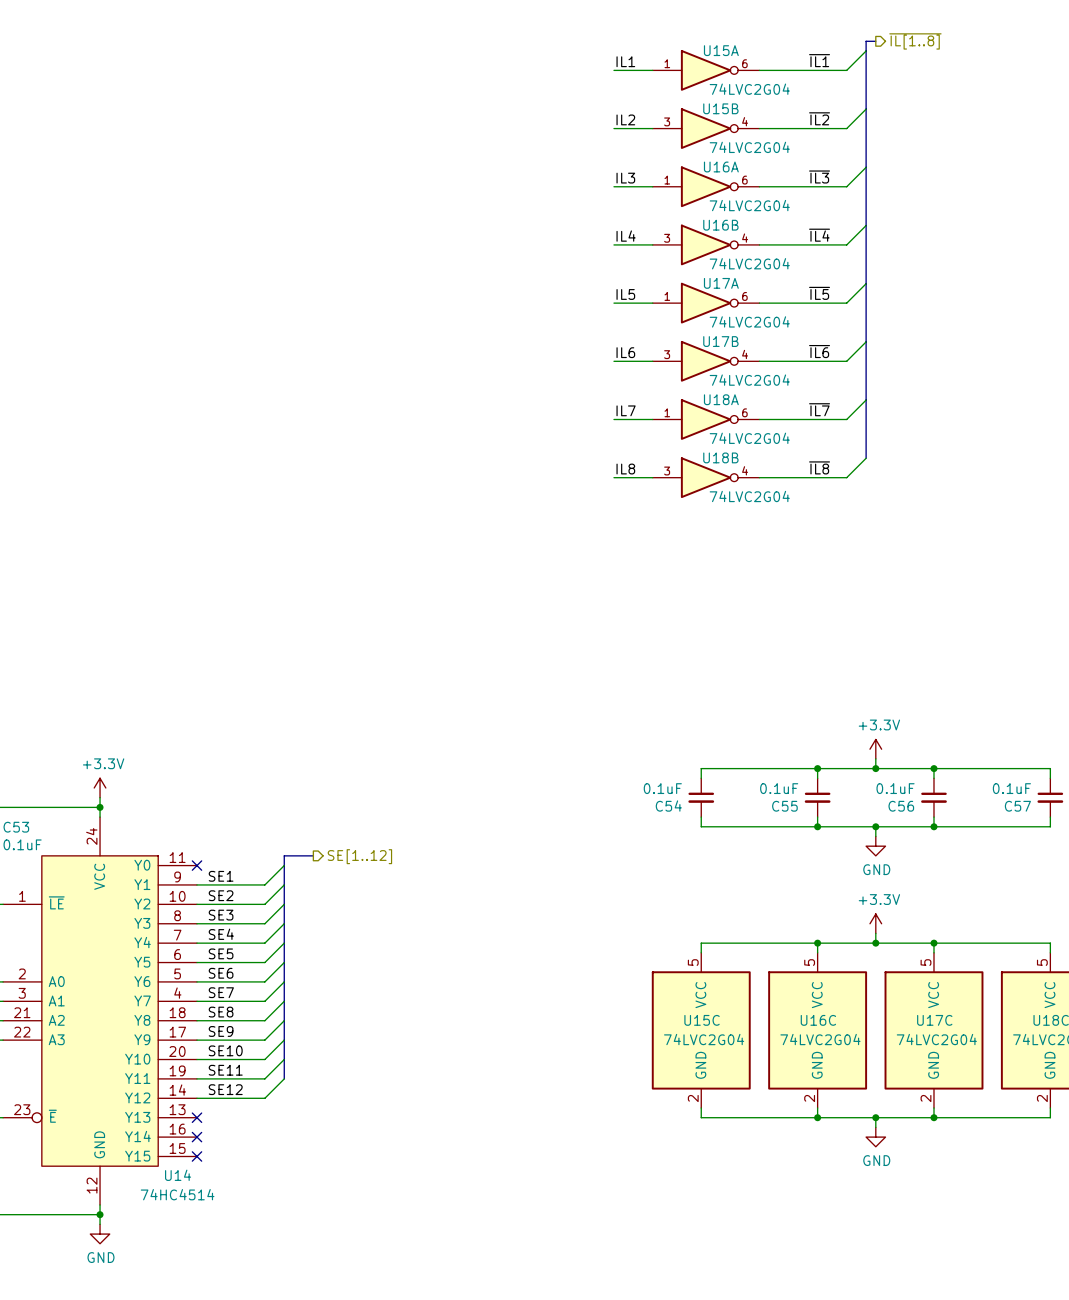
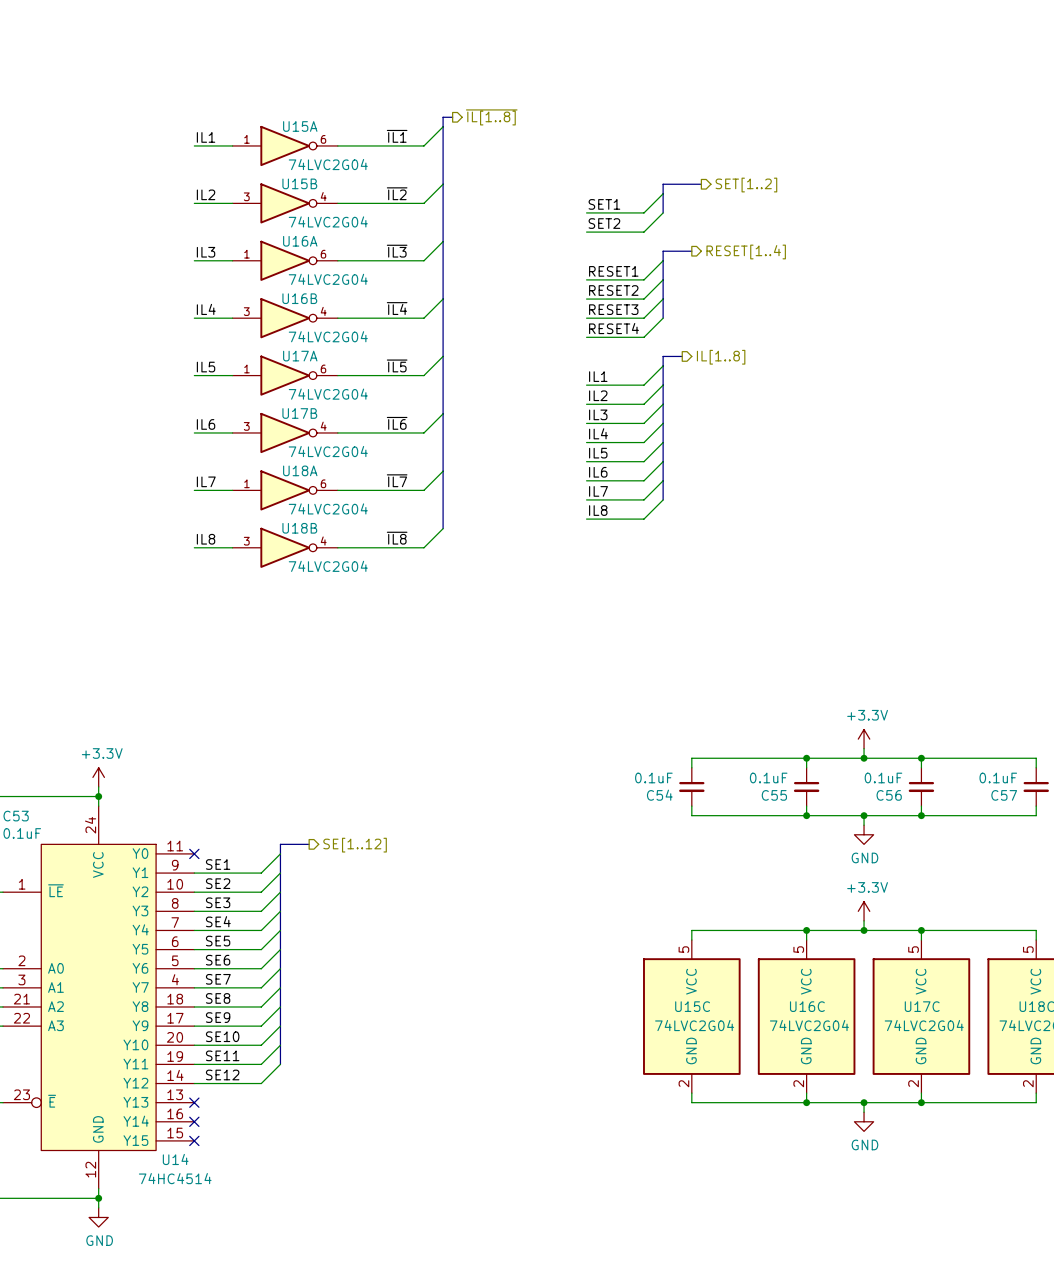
bus: (875, 41) (866, 41) (866, 458) -> none
hierarchical label: ~{IL[1..8]} (915, 41) -> none
wire: (866, 51) (846, 70) (759, 70) -> none
label: ~{IL1} (819, 60) -> none
label: IL1 (625, 61) -> none
wire: (613, 70) (652, 70) -> none
U15A position: (706, 70) -> (285, 145)
wire: (866, 109) (846, 128) (759, 128) -> none
bus: none -> (452, 117) (443, 117) (443, 528)
label: ~{IL2} (819, 118) -> none
hierarchical label: none -> ~{IL[1..8]} (491, 117)
label: IL2 (625, 119) -> none
wire: none -> (443, 126) (423, 145) (337, 145)
wire: (613, 128) (652, 128) -> none
U15B position: (706, 128) -> (285, 203)
label: none -> ~{IL1} (397, 136)
label: none -> IL1 (206, 137)
wire: none -> (194, 145) (232, 145)
wire: (866, 167) (846, 186) (759, 186) -> none
label: ~{IL3} (819, 176) -> none
label: IL3 (625, 178) -> none
wire: none -> (443, 184) (423, 203) (337, 203)
wire: (613, 186) (652, 186) -> none
U16A position: (706, 186) -> (285, 260)
bus: none -> (701, 184) (663, 184) (663, 212)
hierarchical label: none -> SET[1..2] (746, 185)
label: none -> ~{IL2} (397, 193)
wire: none -> (663, 193) (643, 212) (586, 212)
label: none -> IL2 (206, 194)
wire: none -> (194, 203) (232, 203)
label: none -> SET1 (604, 204)
wire: none -> (663, 212) (643, 232) (586, 232)
wire: (866, 225) (846, 244) (759, 244) -> none
label: none -> SET2 (604, 223)
label: ~{IL4} (819, 235) -> none
label: IL4 (626, 236) -> none
wire: none -> (443, 241) (423, 260) (337, 260)
wire: (613, 244) (652, 244) -> none
U16B position: (706, 244) -> (285, 318)
label: none -> ~{IL3} (397, 251)
bus: none -> (691, 251) (663, 251) (663, 318)
label: none -> IL3 (206, 252)
hierarchical label: none -> RESET[1..4] (746, 251)
wire: none -> (194, 260) (232, 260)
wire: none -> (663, 260) (643, 279) (586, 279)
label: none -> RESET1 (613, 271)
wire: none -> (663, 279) (643, 299)
wire: (866, 283) (846, 303) (759, 303) -> none
label: ~{IL5} (819, 293) -> none
label: none -> RESET2 (613, 290)
label position: IL5 (625, 294) -> IL5 (598, 453)
wire: none -> (443, 299) (423, 318) (337, 318)
wire: none -> (586, 299) (605, 299)
wire: none -> (663, 299) (643, 318) (586, 318)
U17A position: (706, 303) -> (285, 375)
label: none -> ~{IL4} (397, 308)
label: none -> IL4 (206, 309)
label: none -> RESET3 (613, 309)
wire: none -> (194, 318) (232, 318)
wire: none -> (663, 318) (643, 337) (586, 337)
label: none -> RESET4 (613, 328)
wire: (866, 341) (846, 361) (759, 361) -> none
label: ~{IL6} (819, 351) -> none
label position: IL6 (625, 352) -> IL6 (598, 472)
wire: none -> (443, 356) (423, 375) (337, 375)
wire: (613, 361) (652, 361) -> none
bus: none -> (682, 356) (663, 356) (663, 499)
U17B position: (706, 361) -> (285, 432)
hierarchical label: none -> IL[1..8] (721, 357)
label: none -> ~{IL5} (397, 365)
wire: none -> (663, 366) (643, 385) (586, 385)
label: none -> IL5 (206, 367)
wire: none -> (194, 375) (232, 375)
label: none -> IL1 (598, 376)
wire: none -> (663, 385) (643, 404) (586, 404)
wire: (866, 400) (846, 419) (759, 419) -> none
label: none -> IL2 (598, 395)
wire: none -> (663, 404) (643, 423) (586, 423)
label: ~{IL7} (819, 409) -> none
label position: IL7 (626, 410) -> IL7 (598, 491)
wire: none -> (443, 413) (423, 432) (337, 432)
wire: (613, 419) (652, 419) -> none
U18A position: (706, 419) -> (285, 490)
label: none -> IL3 (598, 414)
label: none -> ~{IL6} (397, 423)
wire: none -> (663, 423) (643, 442) (586, 442)
label: none -> IL6 (206, 424)
wire: none -> (194, 432) (232, 432)
label: none -> IL4 (598, 433)
wire: none -> (663, 442) (643, 461) (586, 461)
wire: (866, 458) (846, 477) (759, 477) -> none
wire: none -> (663, 461) (643, 480) (586, 480)
label: ~{IL8} (819, 467) -> none
label position: IL8 (625, 469) -> IL8 (598, 510)
wire: none -> (443, 471) (423, 490) (337, 490)
wire: (613, 477) (652, 477) -> none
U18B position: (706, 477) -> (285, 547)
label: none -> ~{IL7} (397, 480)
wire: none -> (663, 480) (643, 499) (586, 499)
label: none -> IL7 (206, 481)
wire: none -> (194, 490) (232, 490)
wire: none -> (663, 499) (643, 519) (586, 519)
wire: none -> (443, 528) (423, 547) (337, 547)
label: none -> ~{IL8} (397, 538)
label: none -> IL8 (206, 539)
wire: none -> (194, 547) (232, 547)

